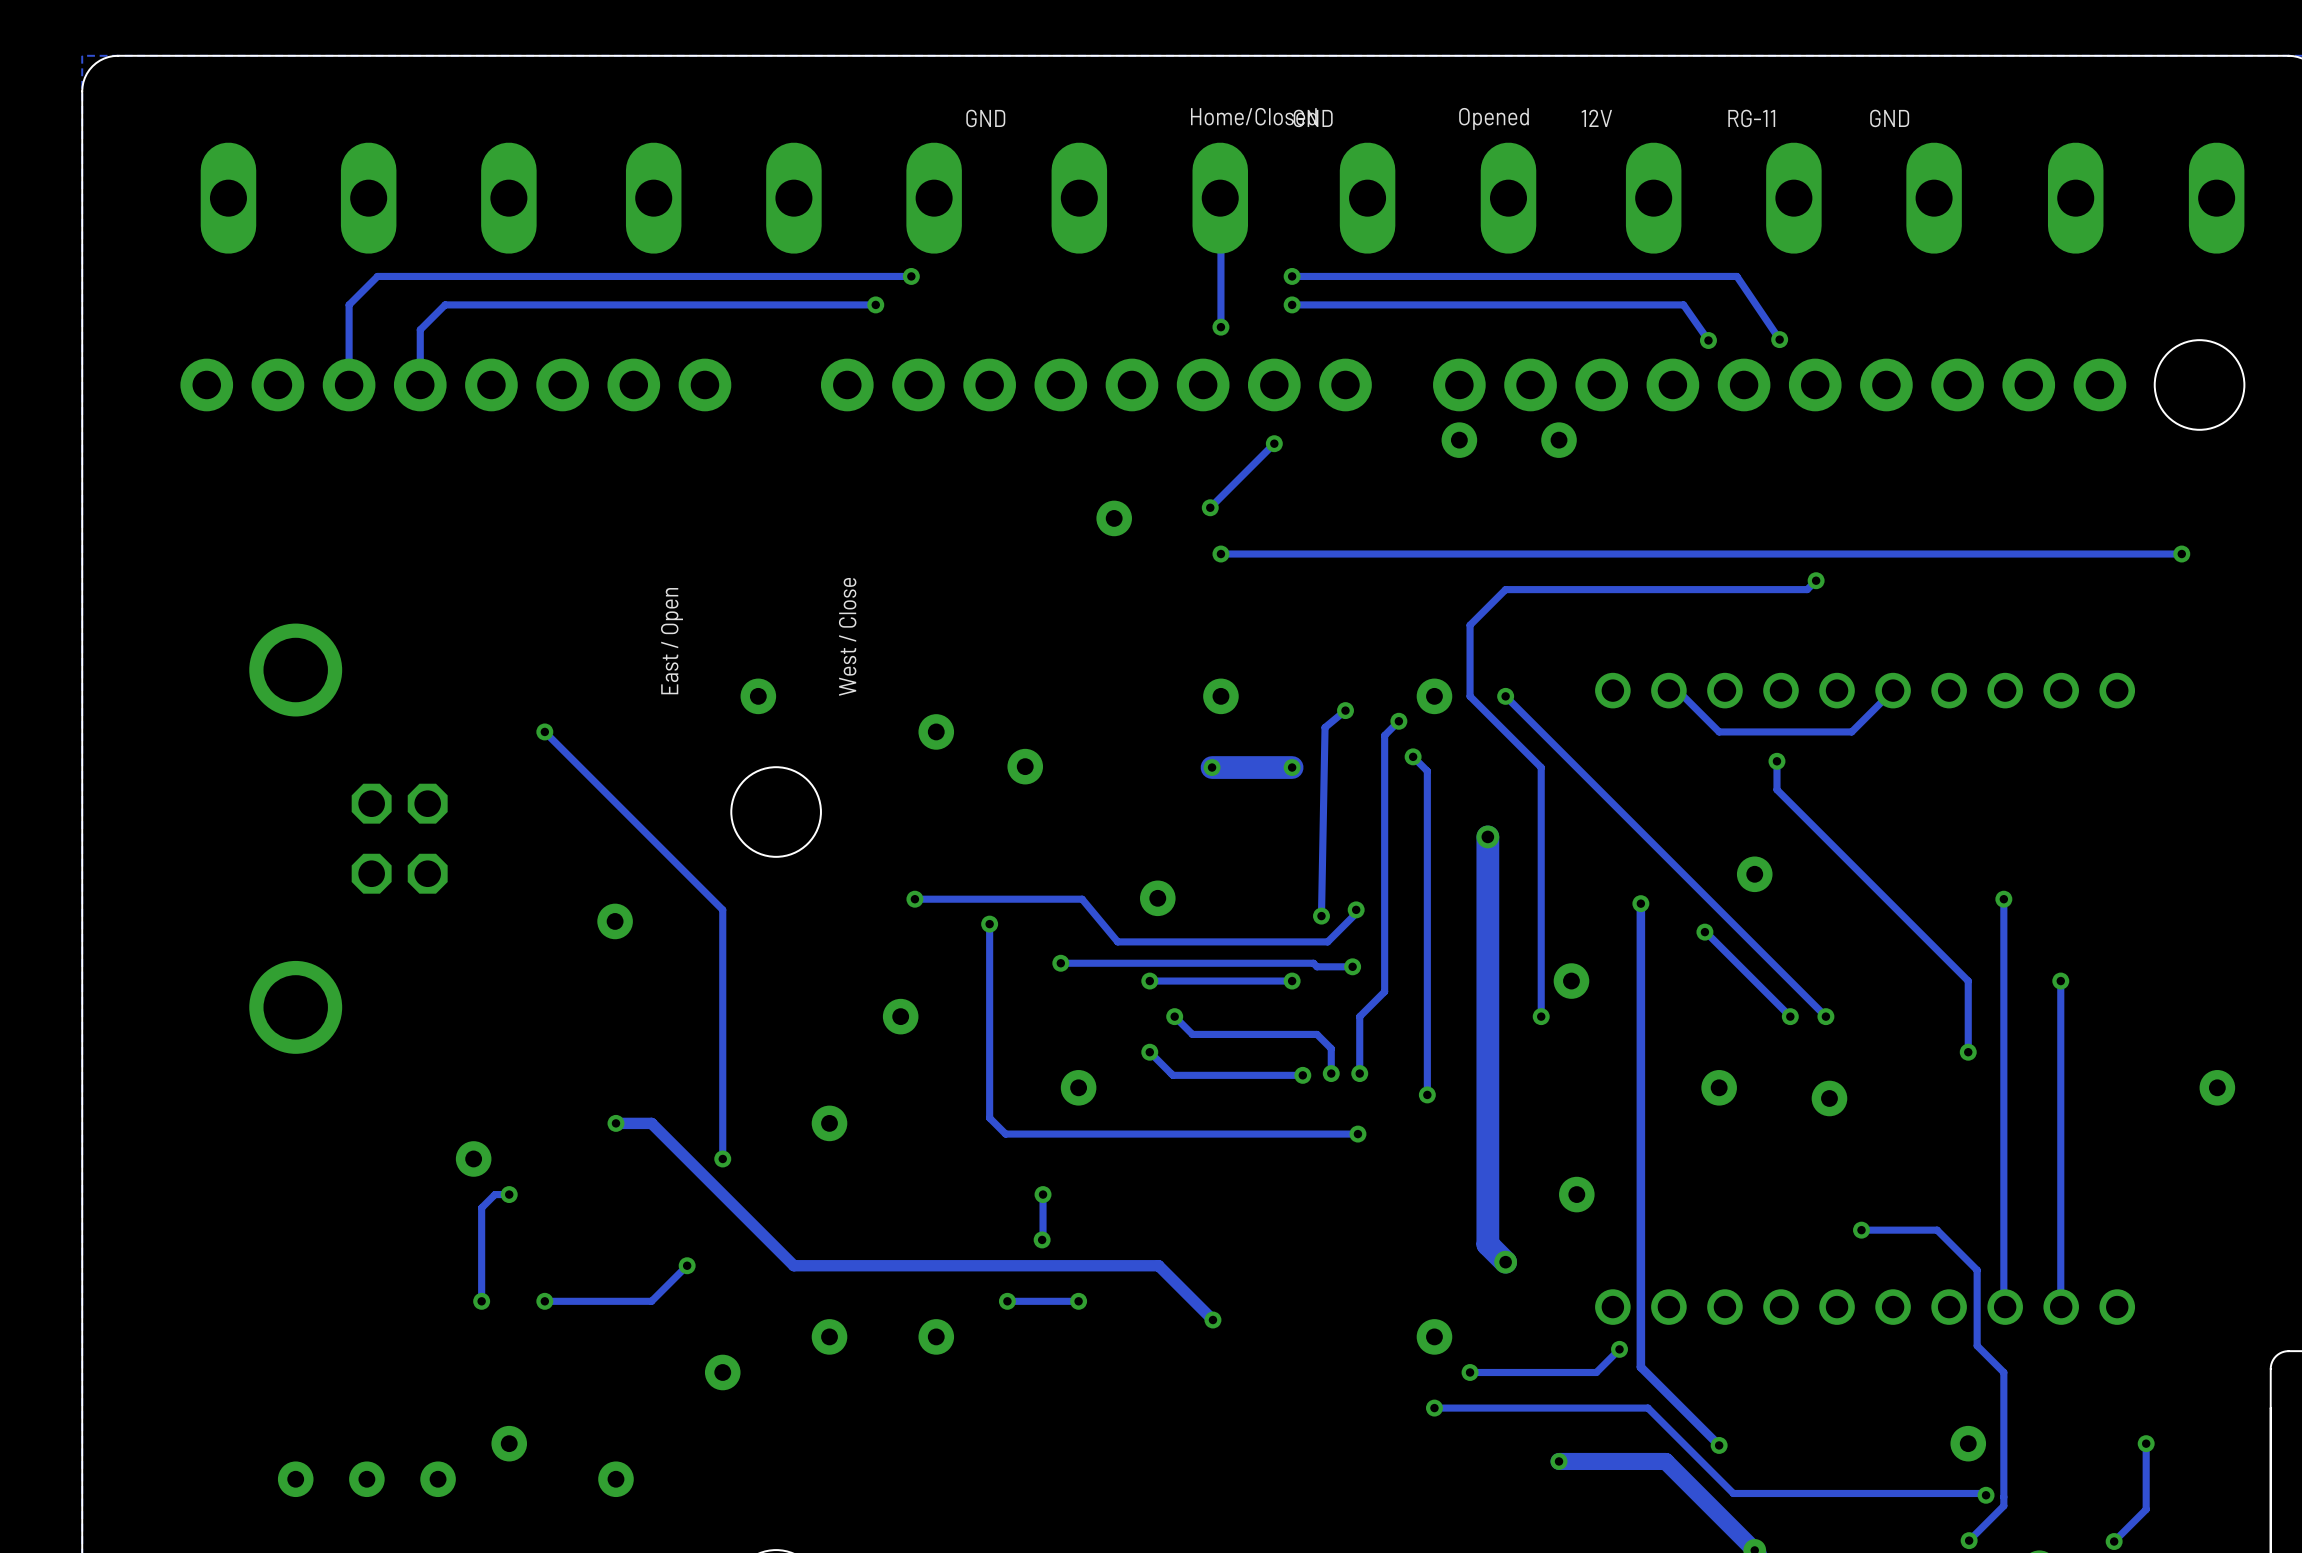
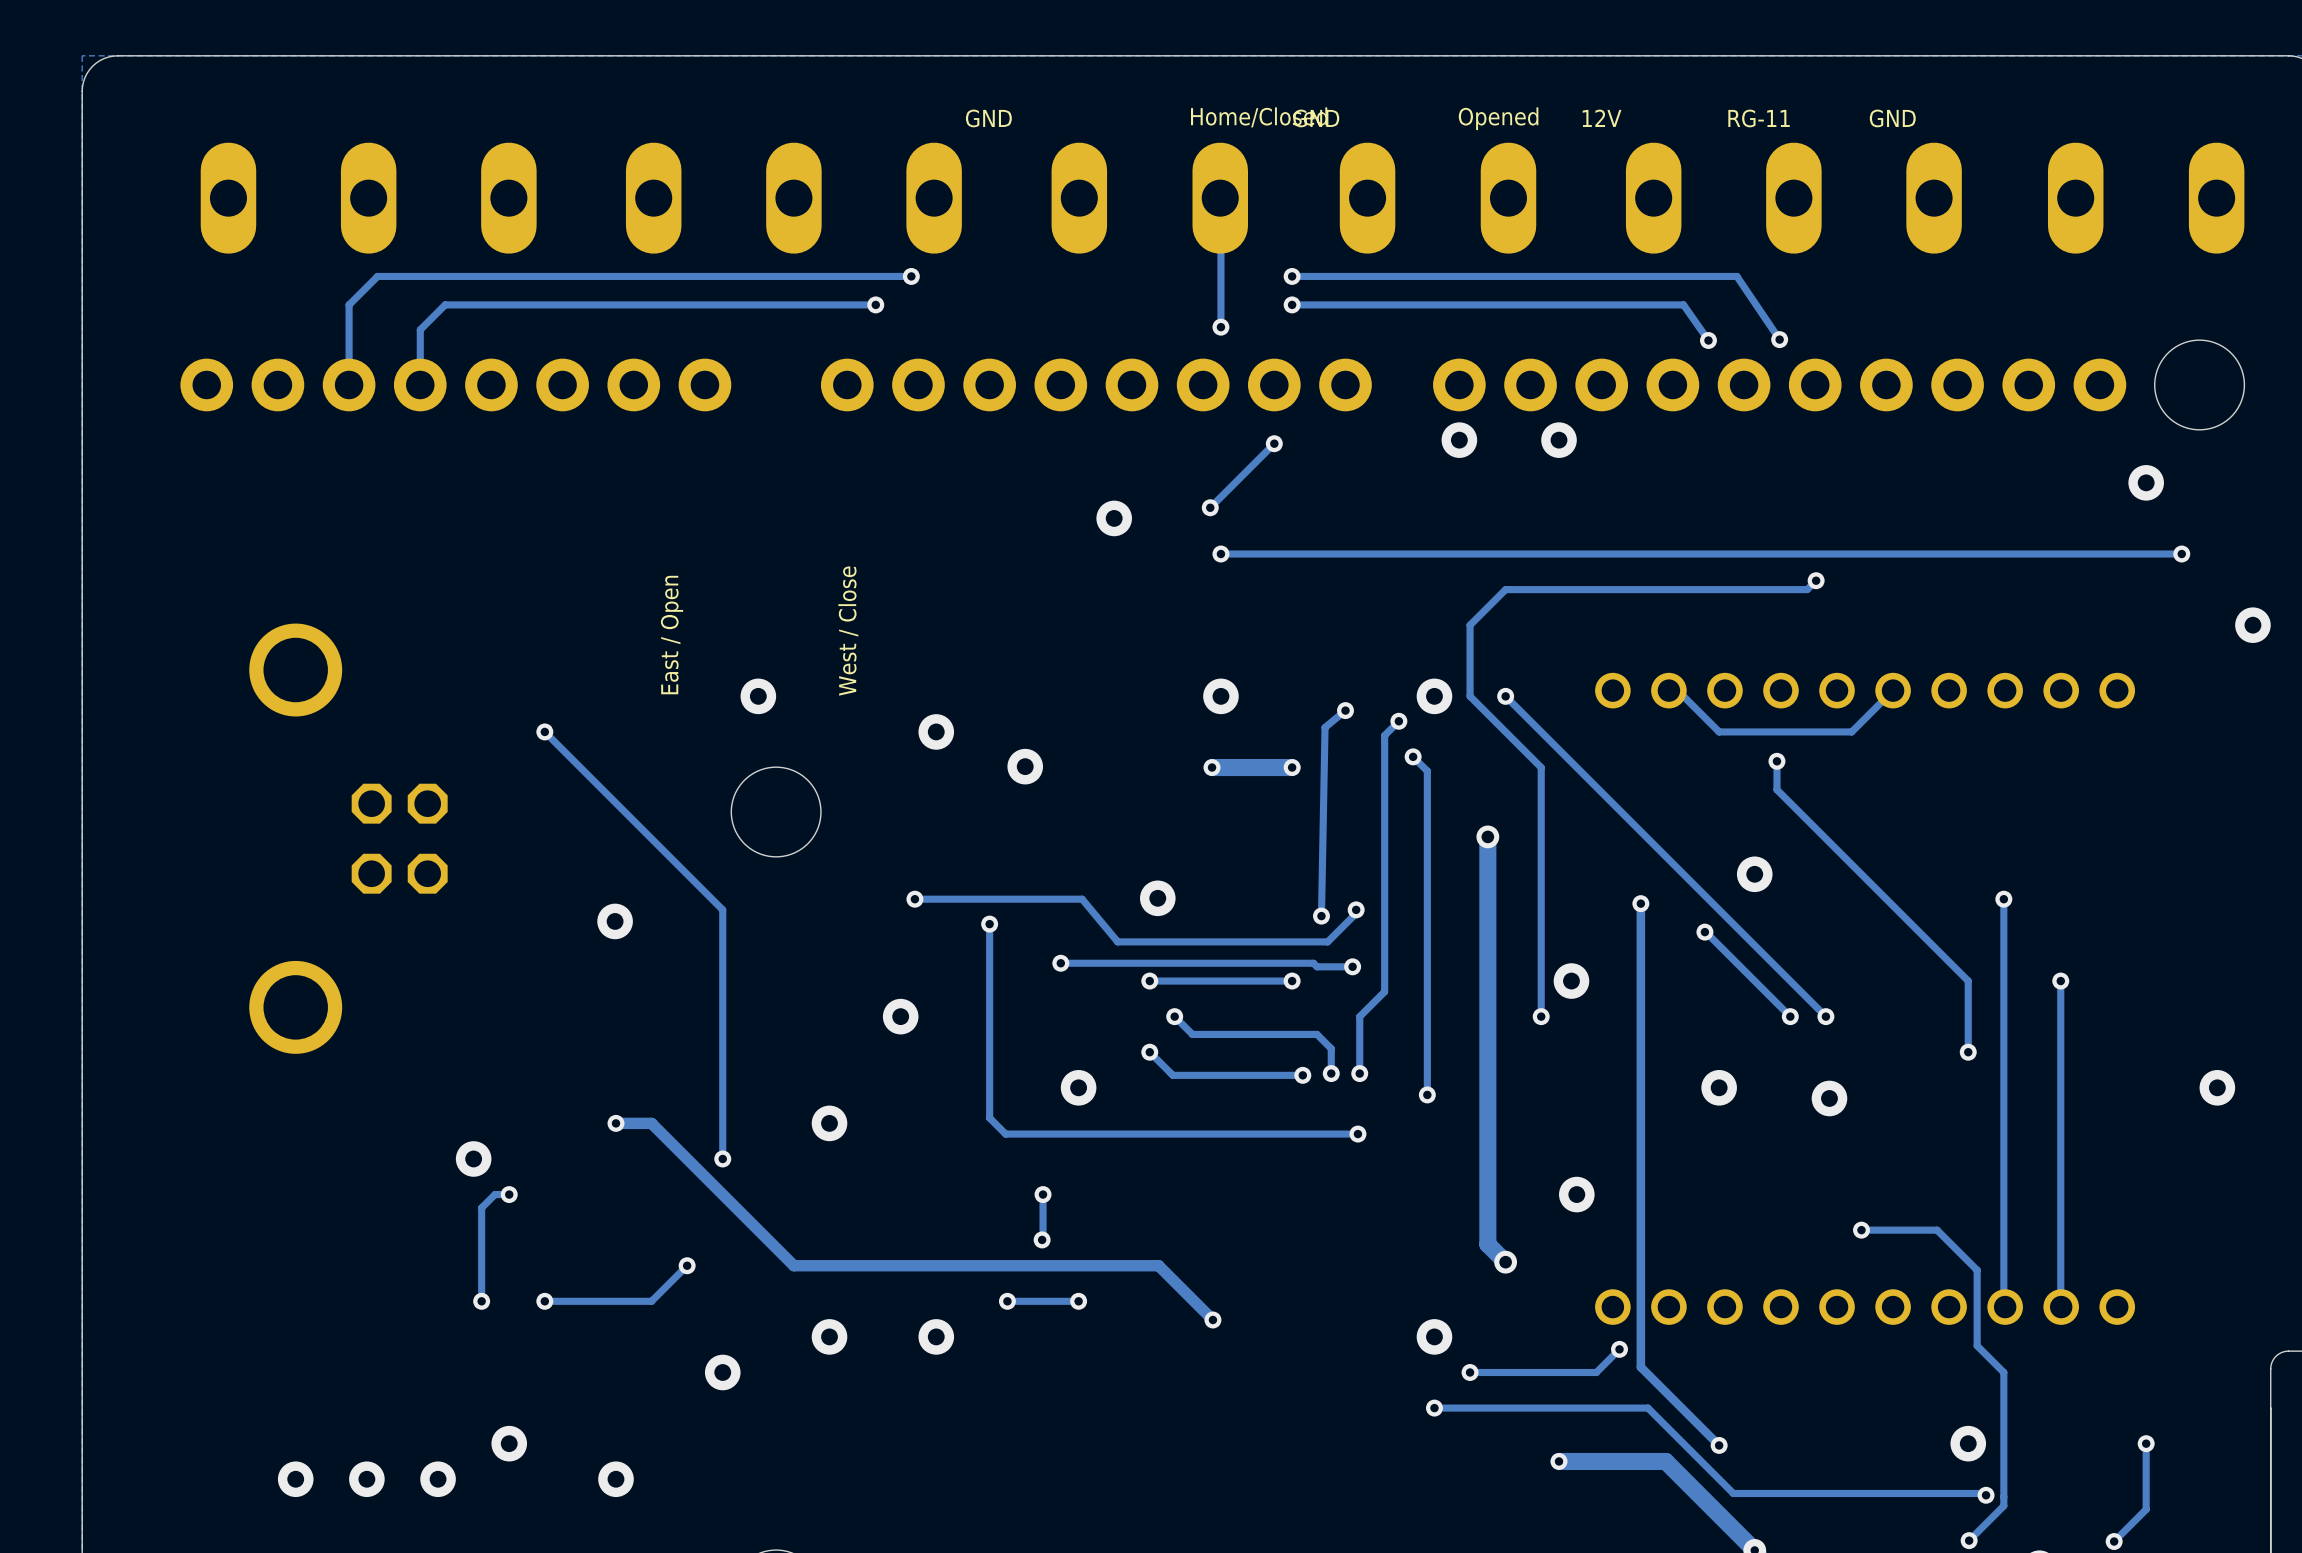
via: none -> (2146, 482)
via: none -> (2252, 625)
track width: thick (1292, 767) (1212, 767) -> thin (1292, 767) (1212, 767)
track width: thick (1487, 836) (1487, 1244) (1505, 1262) -> thin (1487, 836) (1487, 1244) (1505, 1262)

